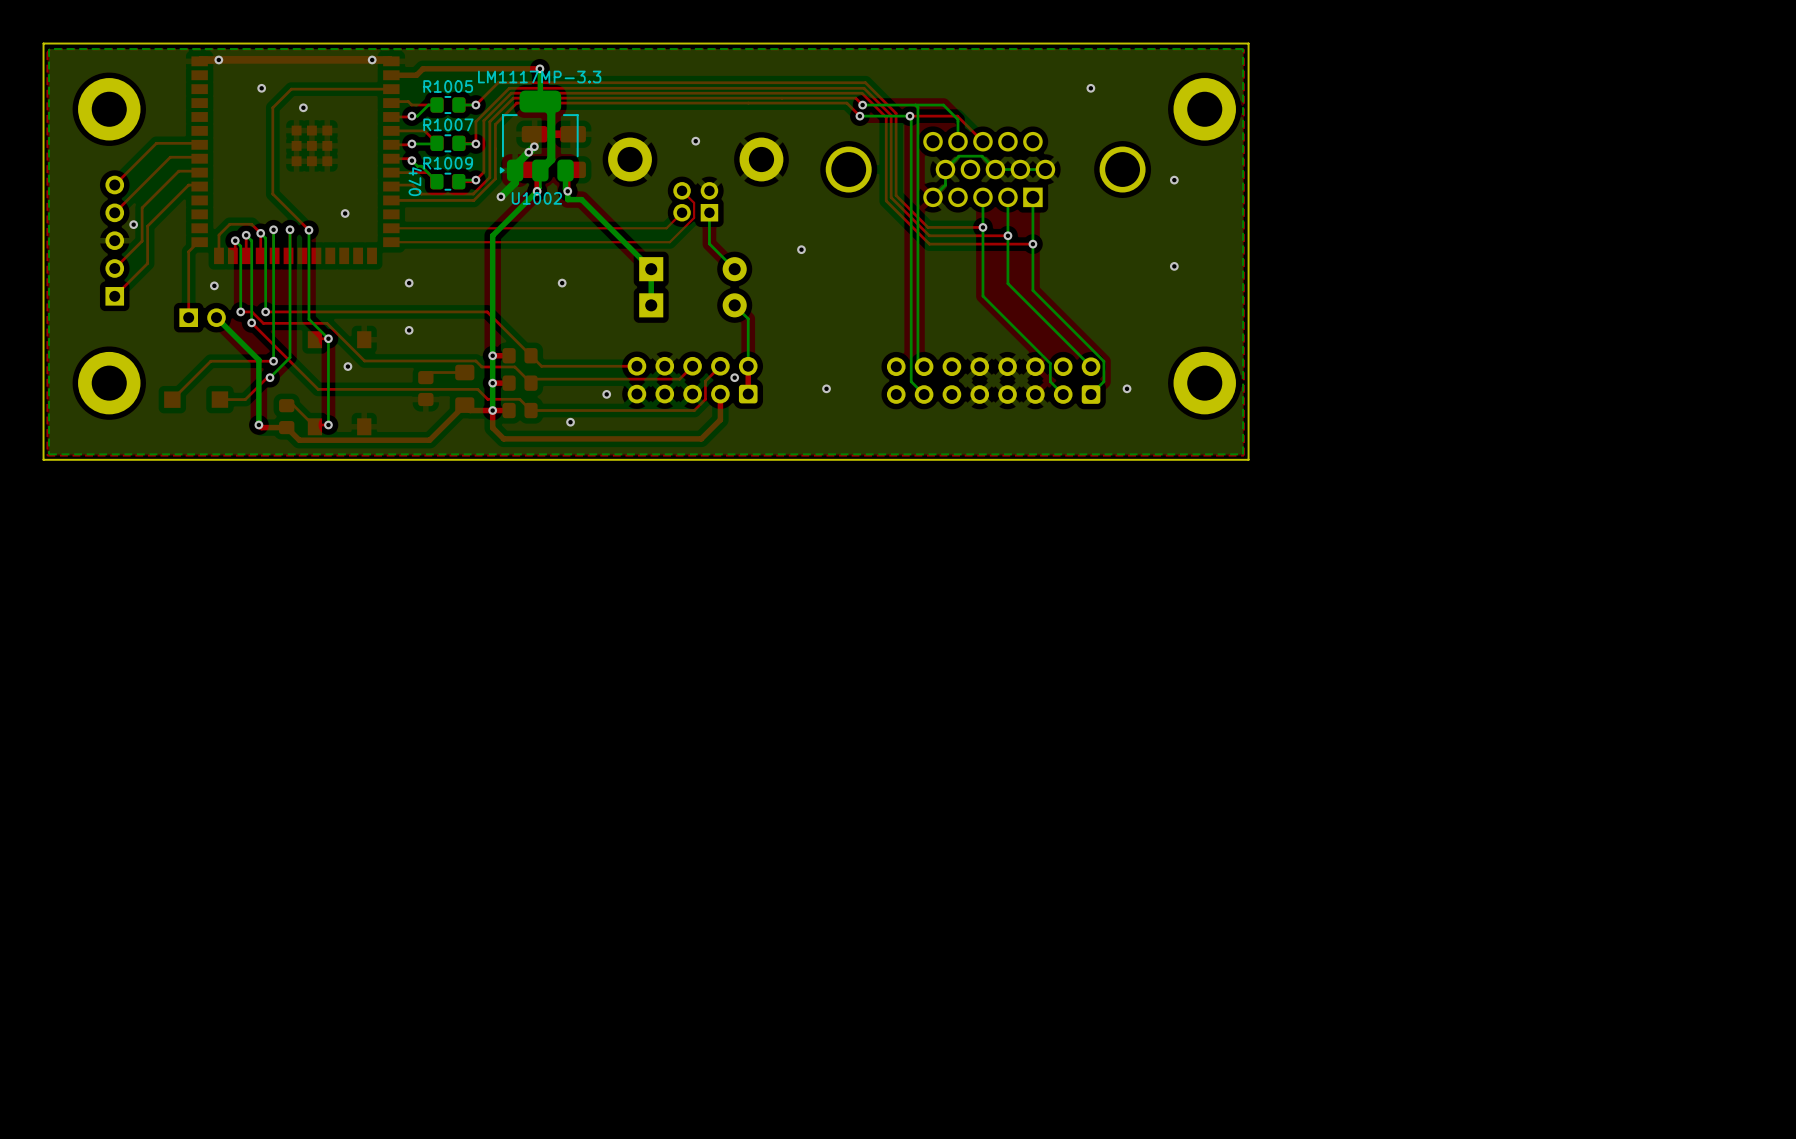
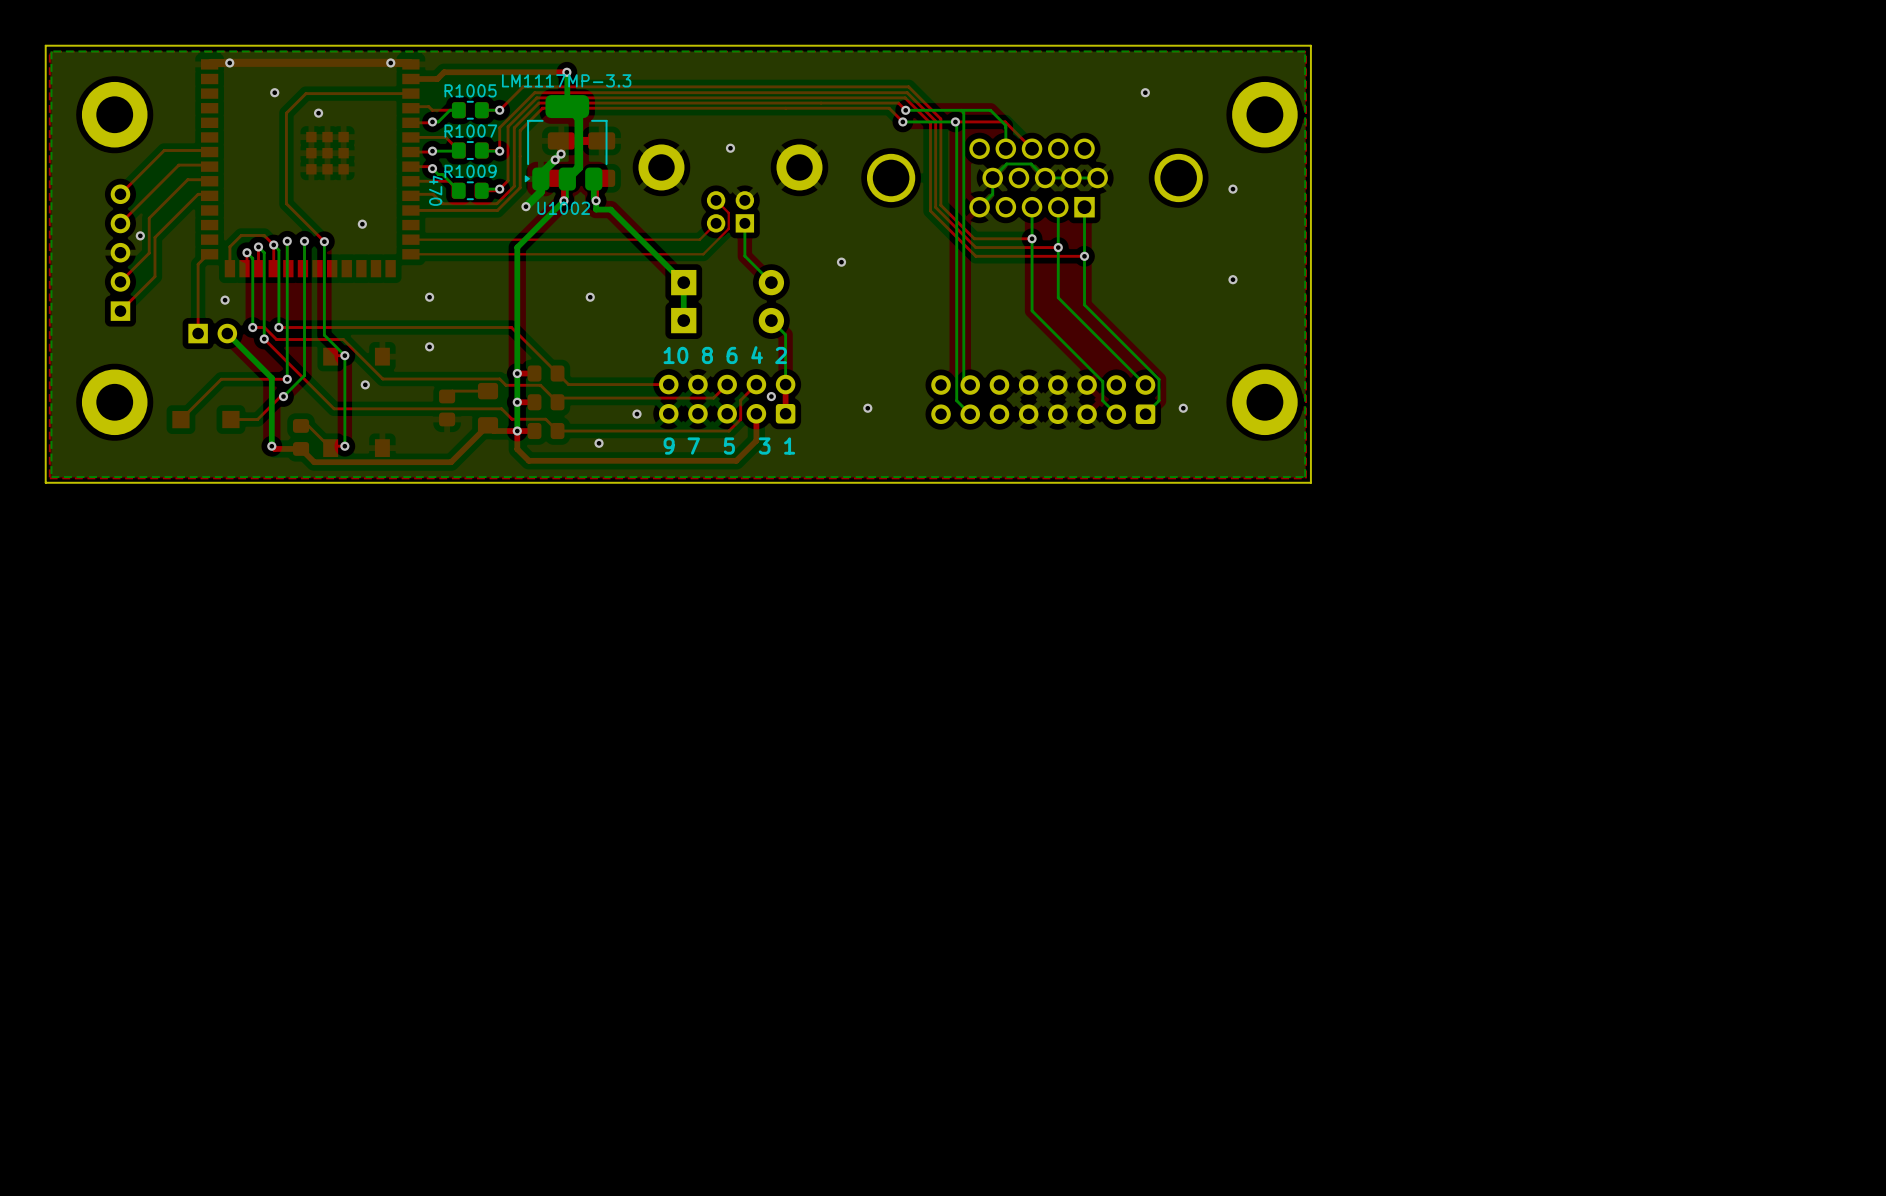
text: none -> 10 8 6 4 2 (725, 355)
text: none -> 9 7 5 3 1 (729, 446)

